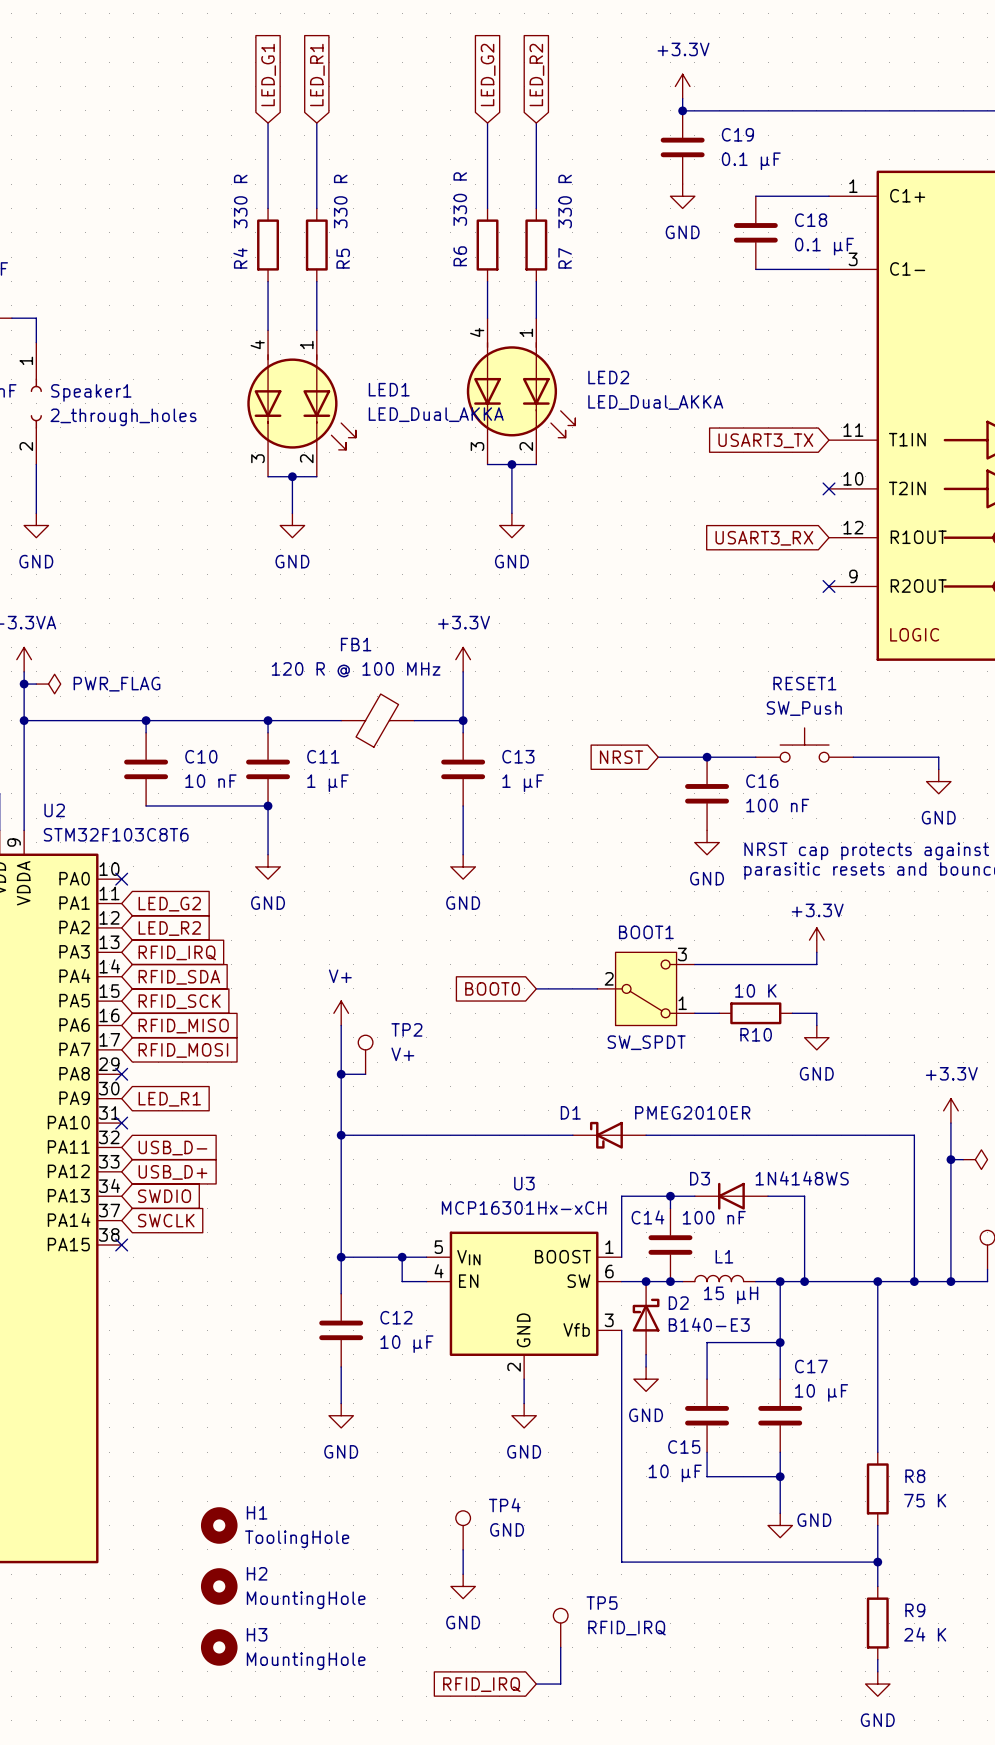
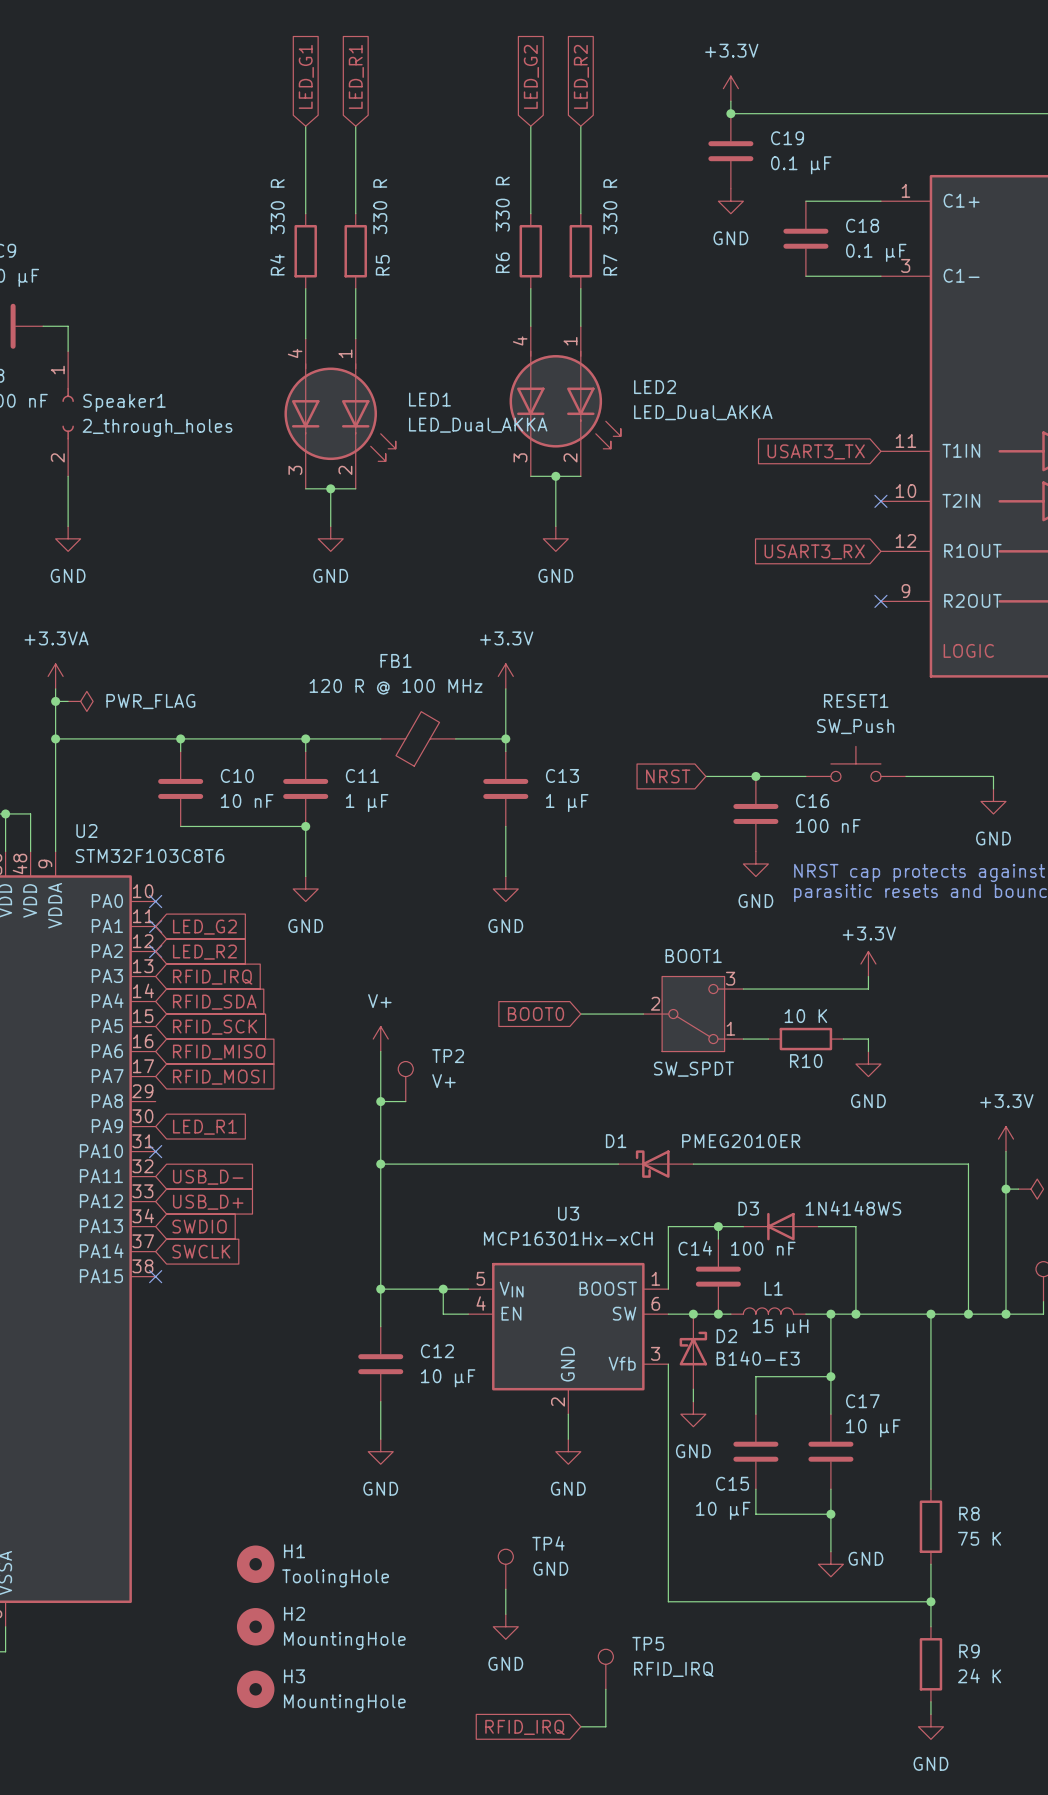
no-connect mark: none -> (155, 926)
no-connect mark: none -> (155, 951)
no-connect mark: (121, 1074) -> none

